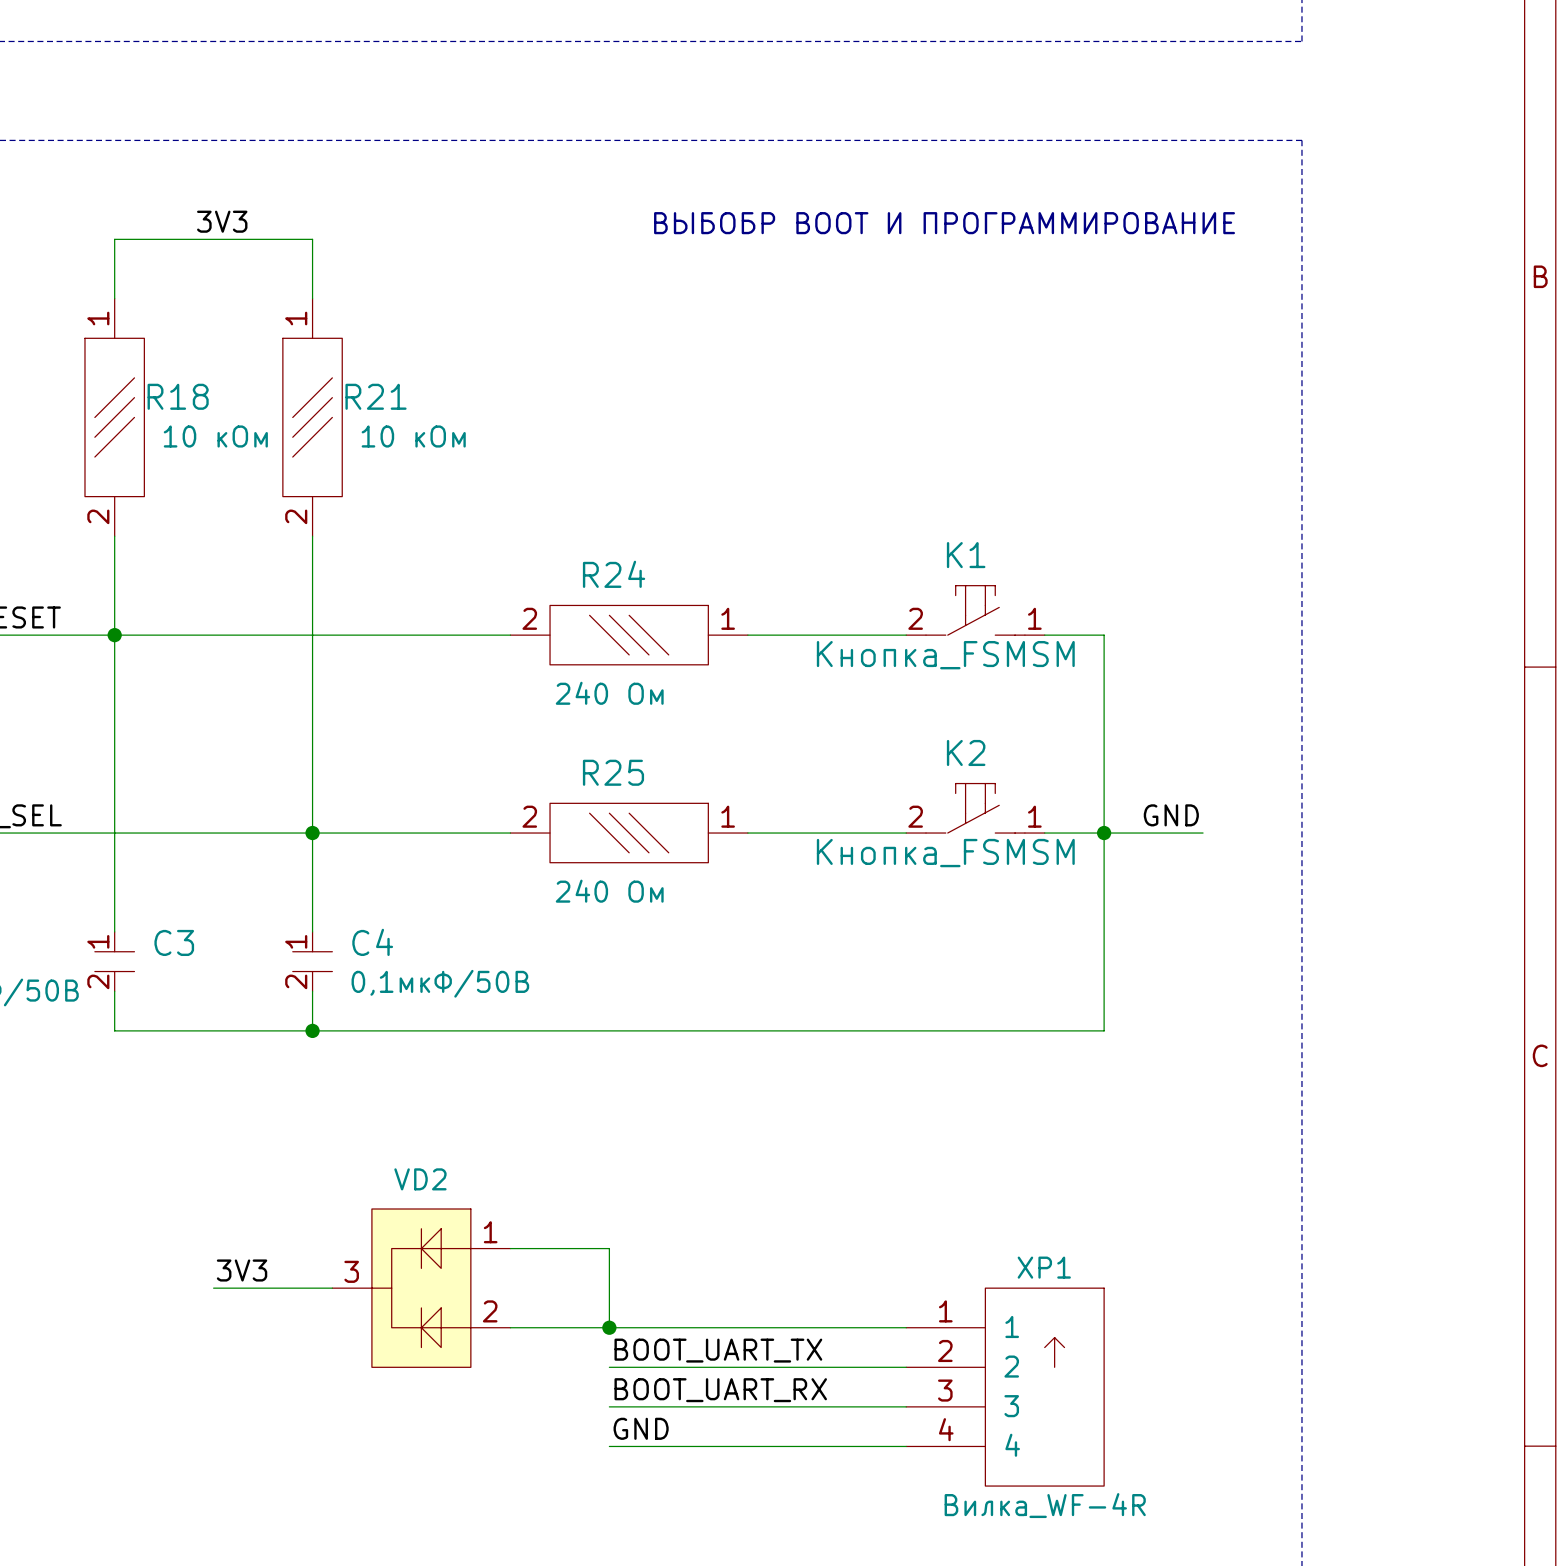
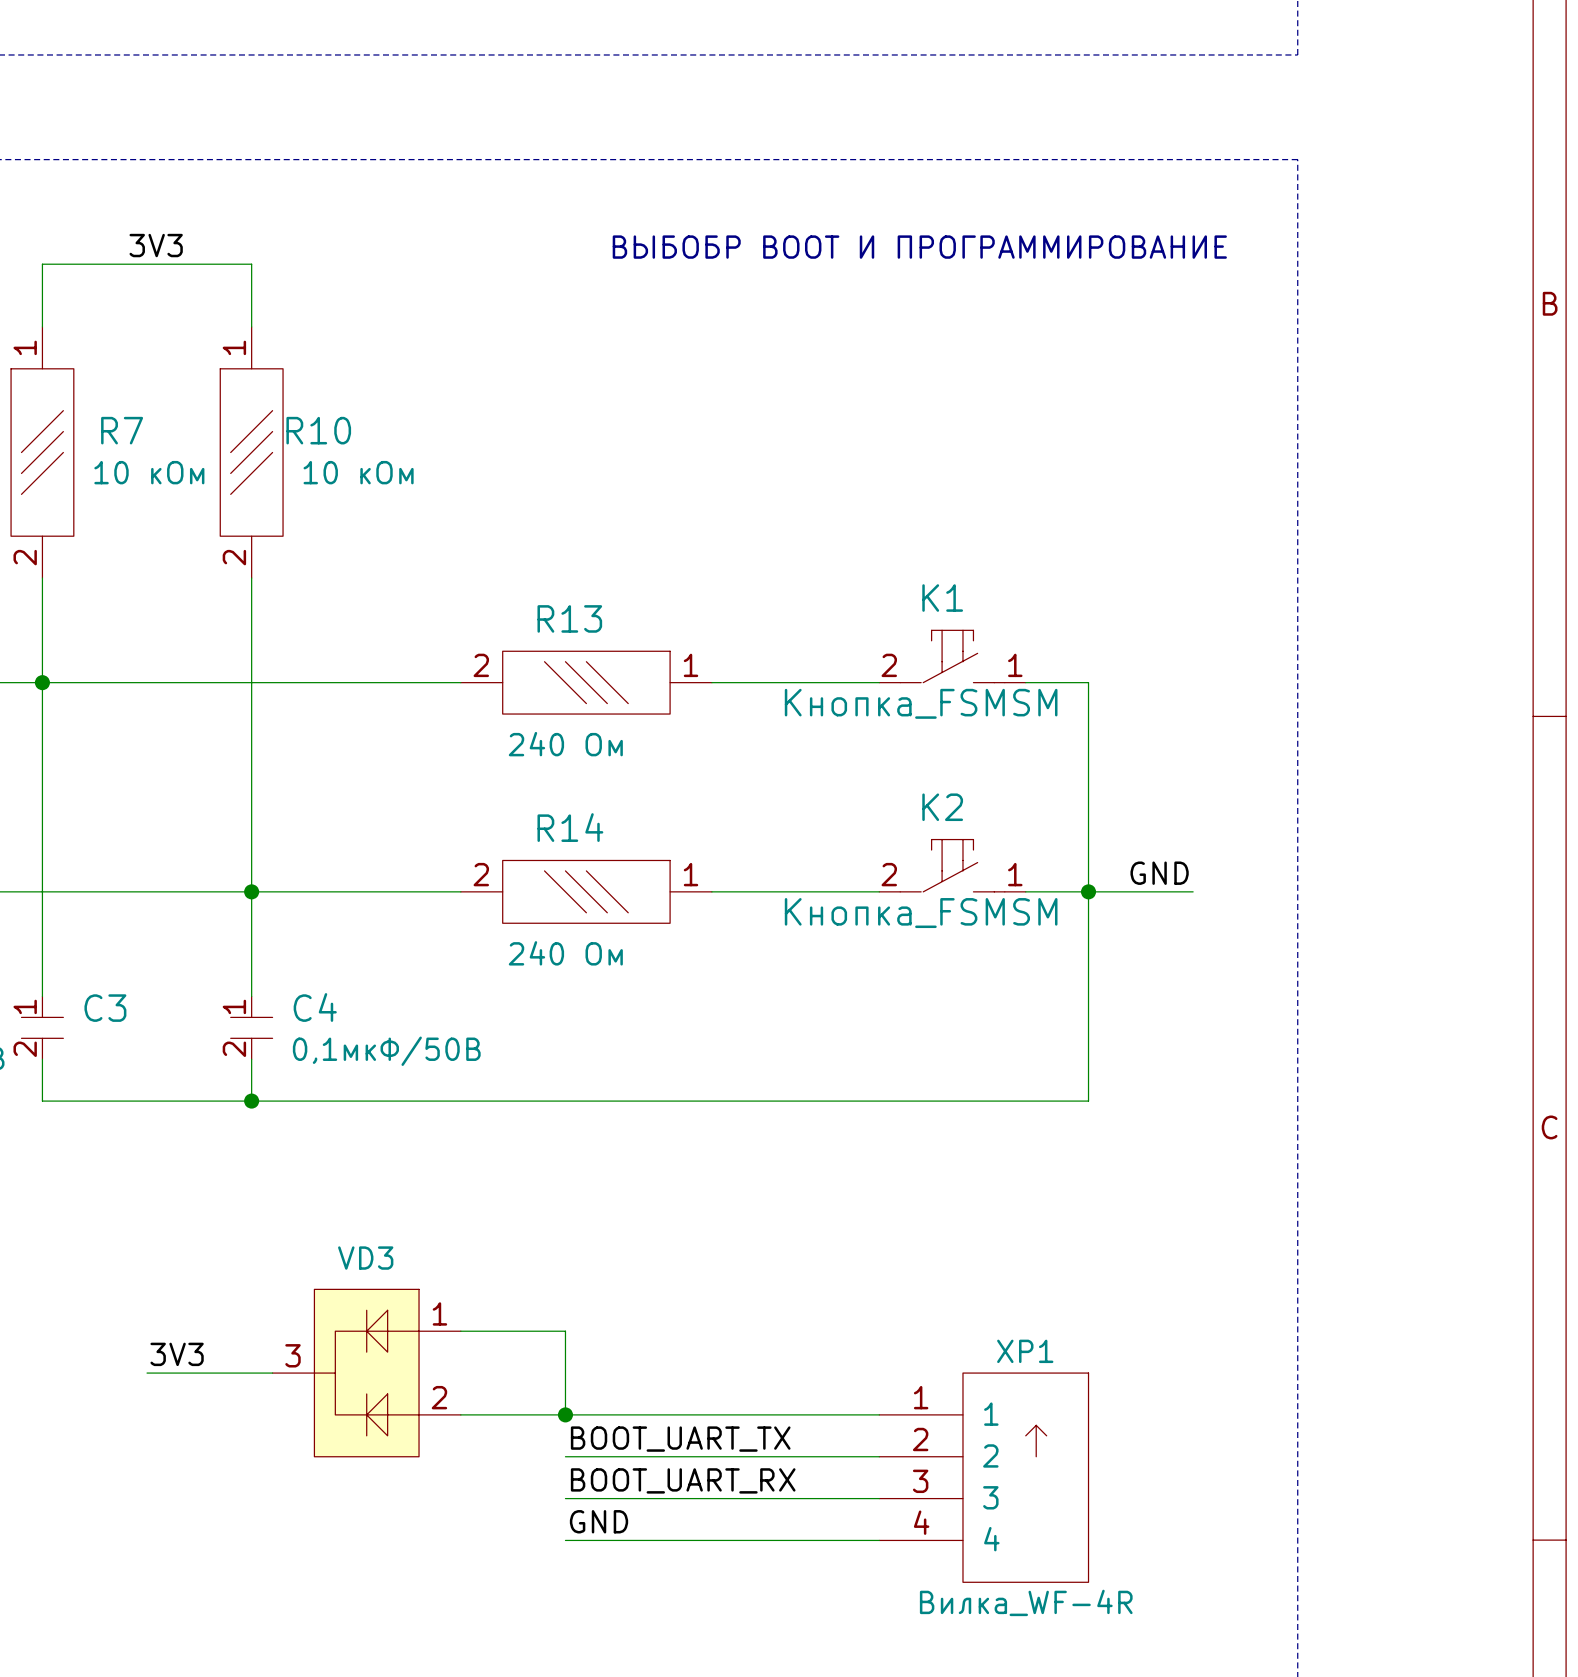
R18 name: R18 (178, 396) -> R7 (122, 430)
R21 name: R21 (376, 396) -> R10 (318, 430)
R24 name: R24 (614, 574) -> R13 (569, 618)
R25 name: R25 (613, 772) -> R14 (570, 827)
VD2 name: VD2 (420, 1179) -> VD3 (365, 1258)

